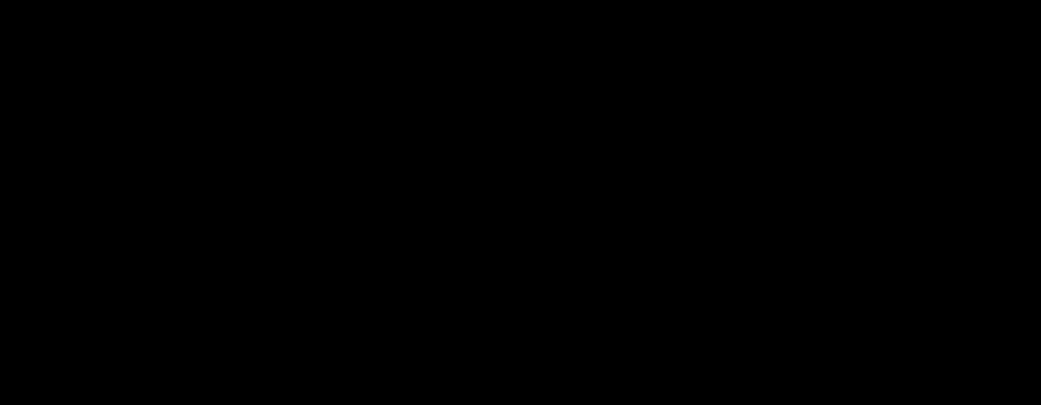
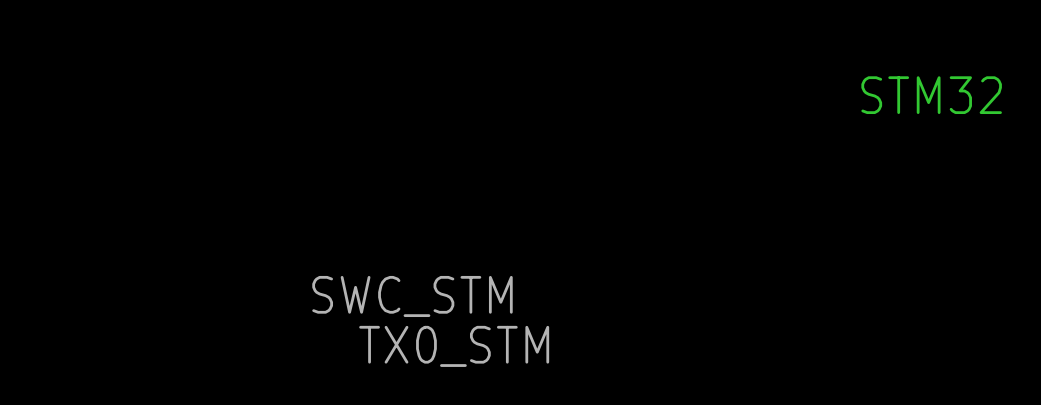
text: none -> STM32 (931, 95)
label: none -> SWC_STM (412, 296)
label: none -> TX0_STM (454, 346)

